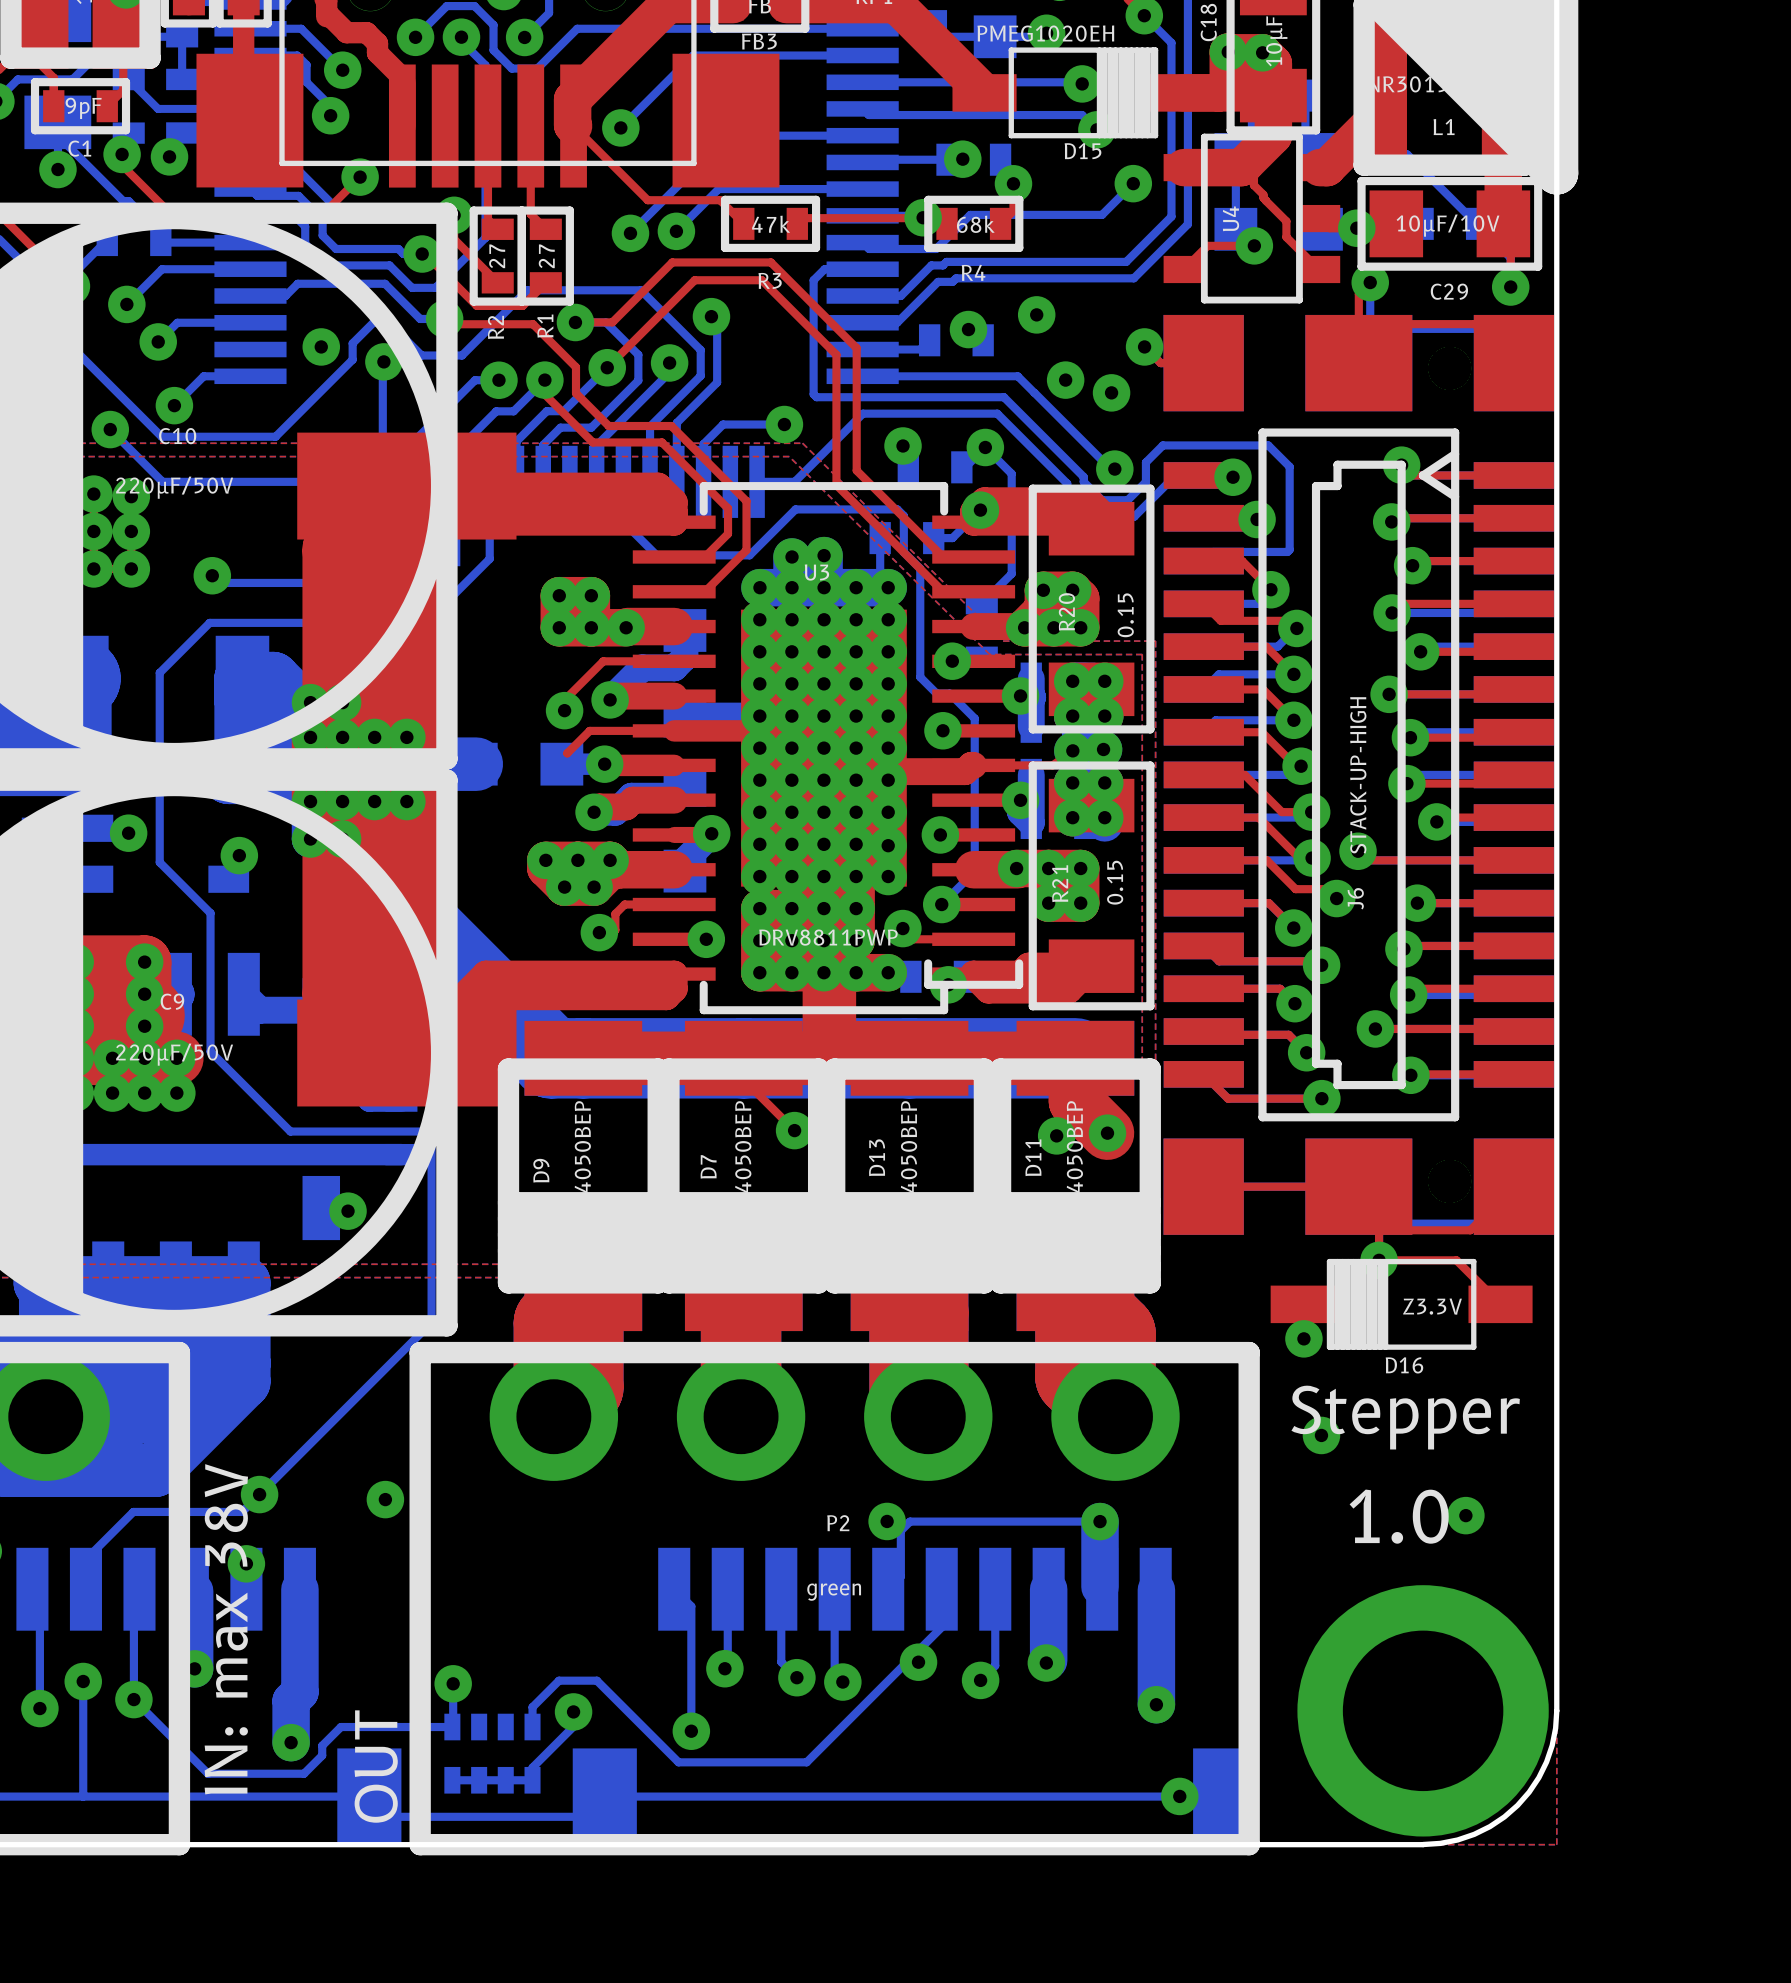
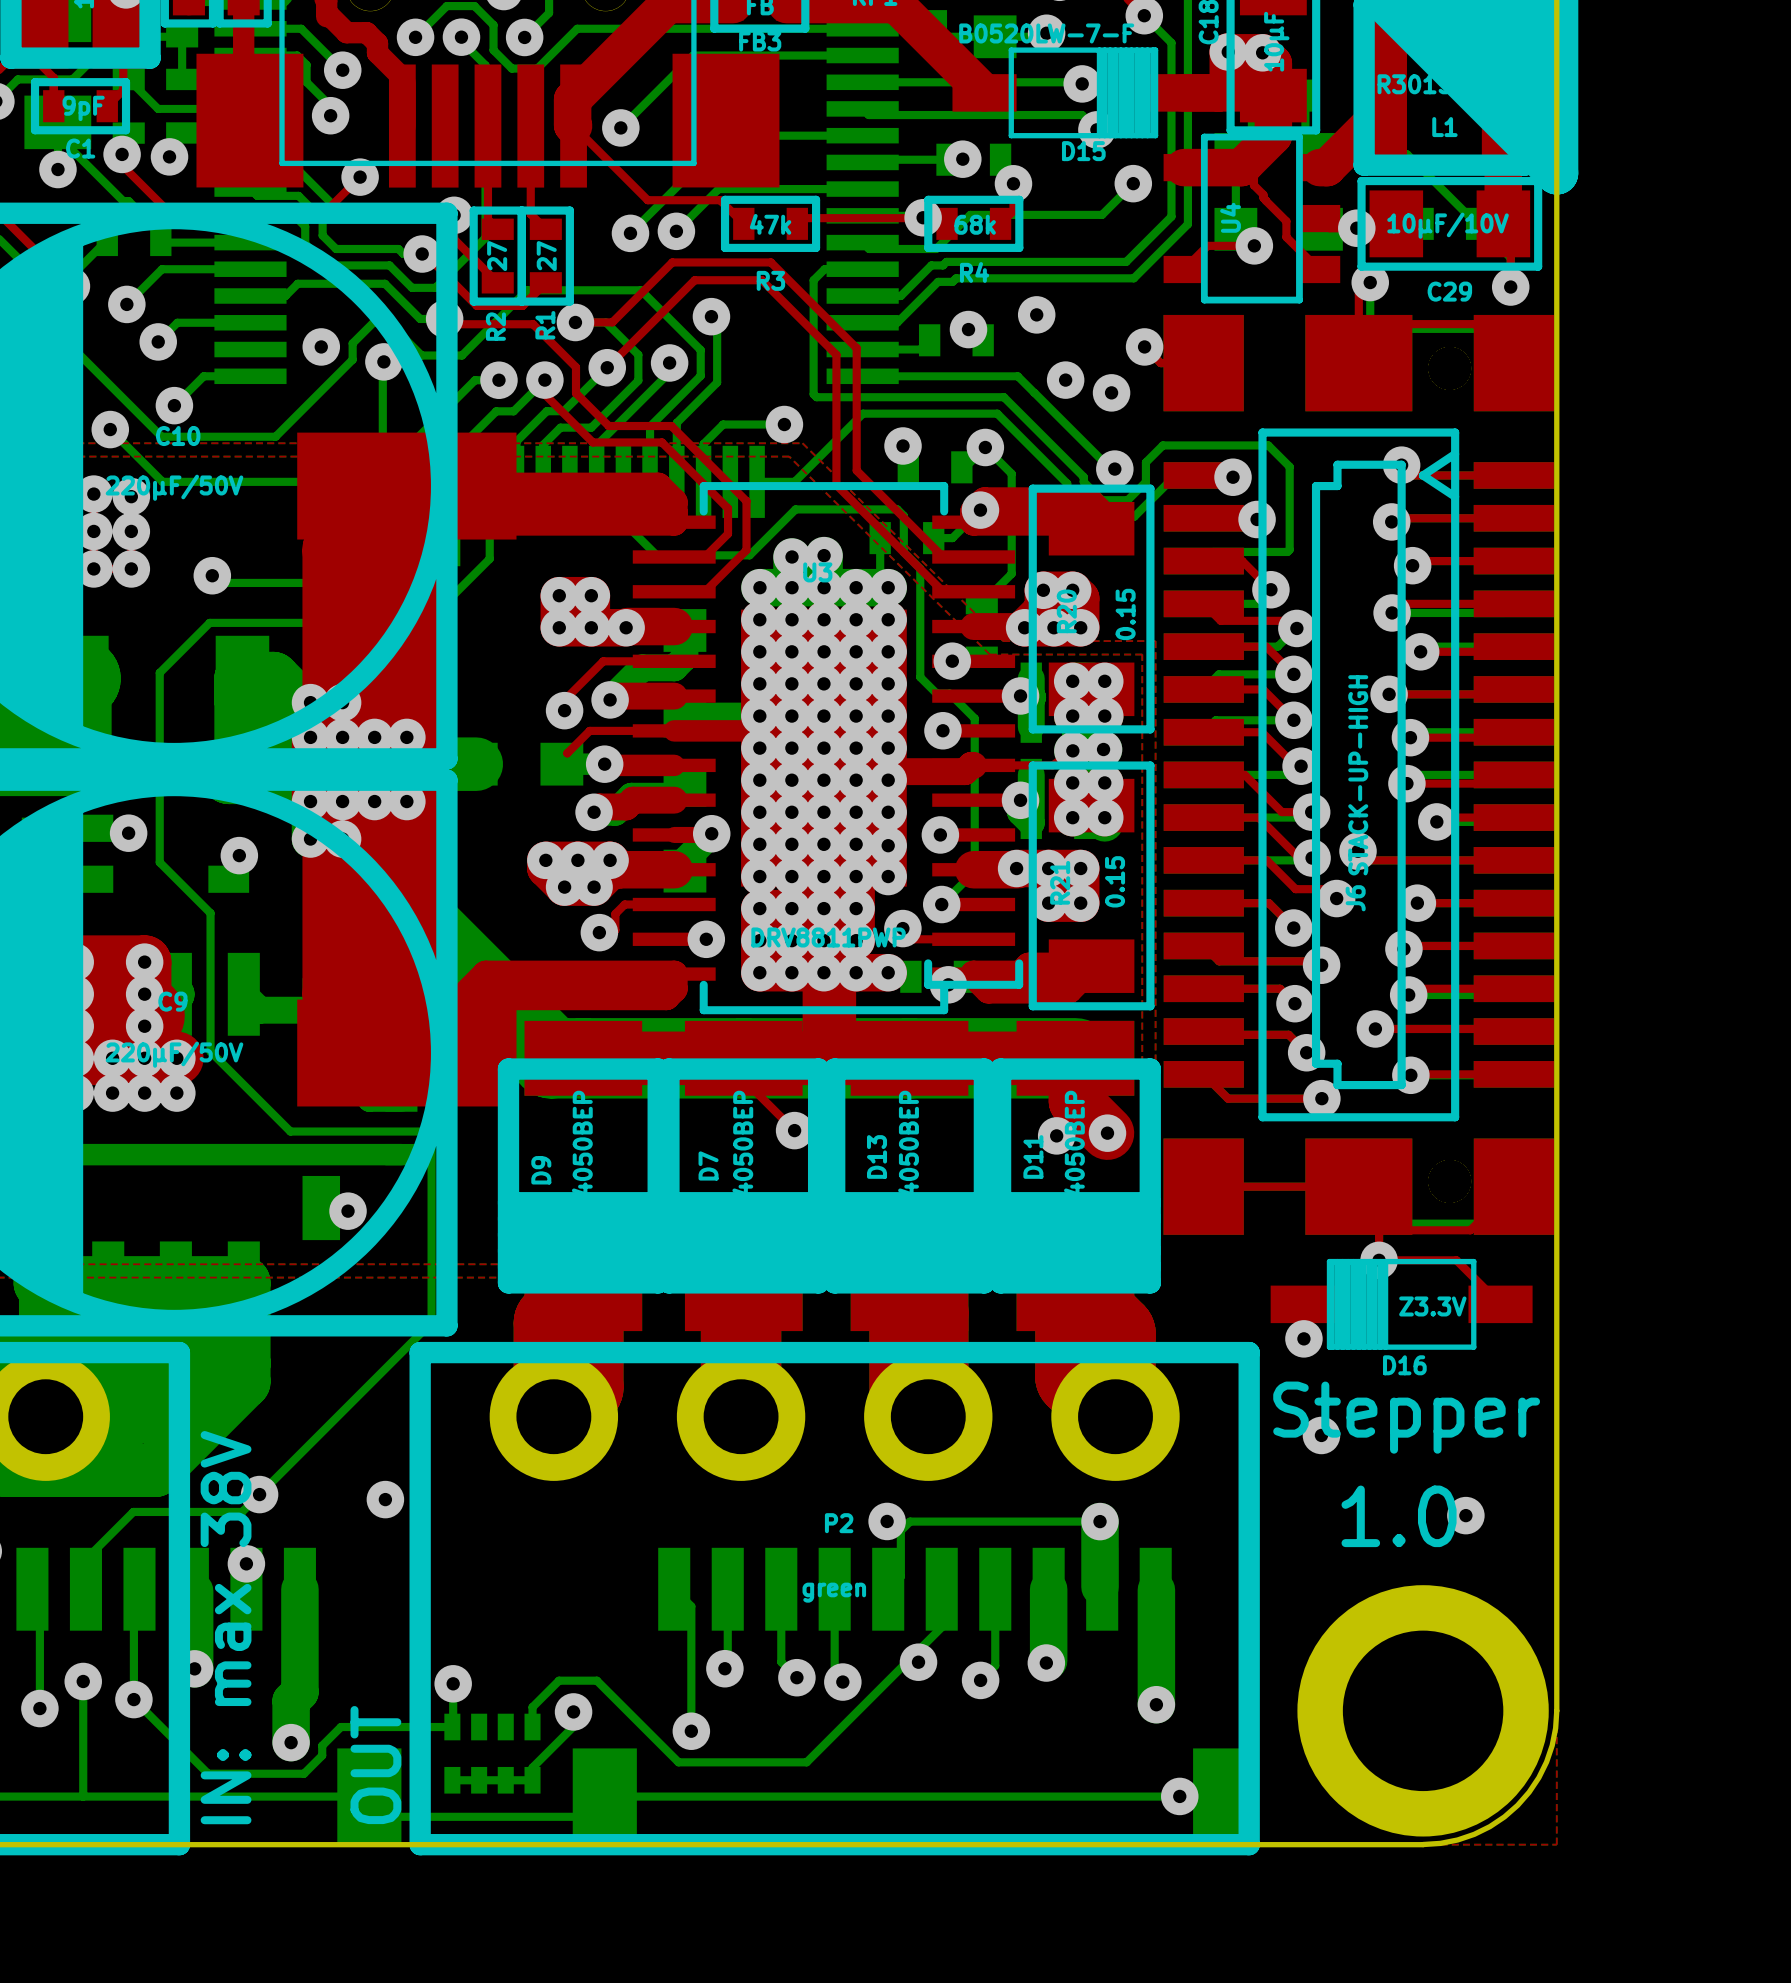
D15 value: PMEG1020EH (1045, 33) -> B0520LW-7-F (1046, 33)

